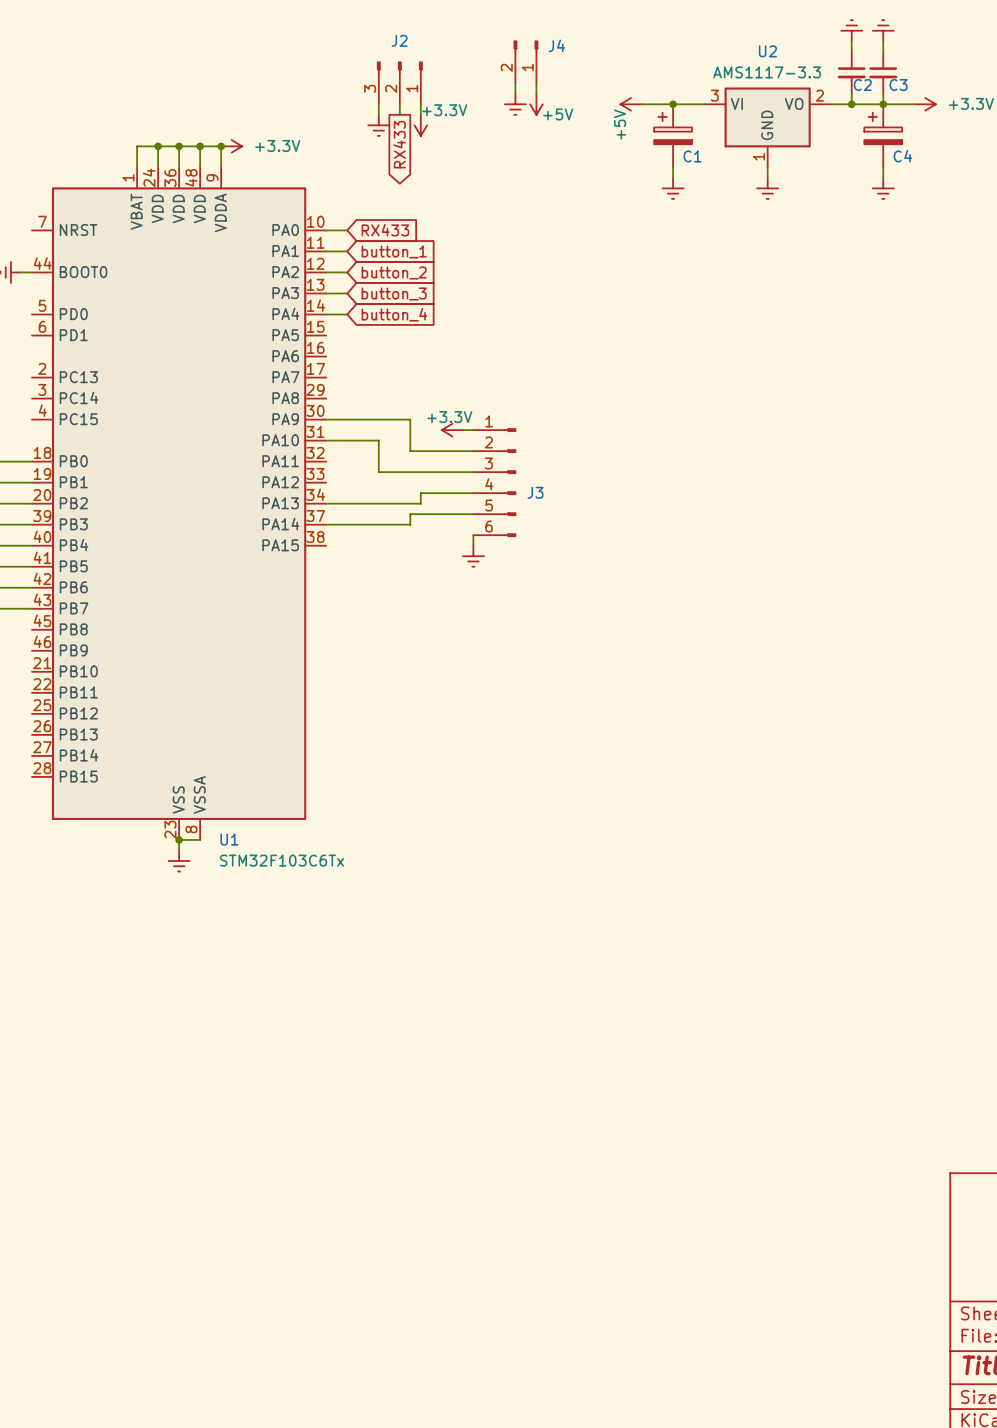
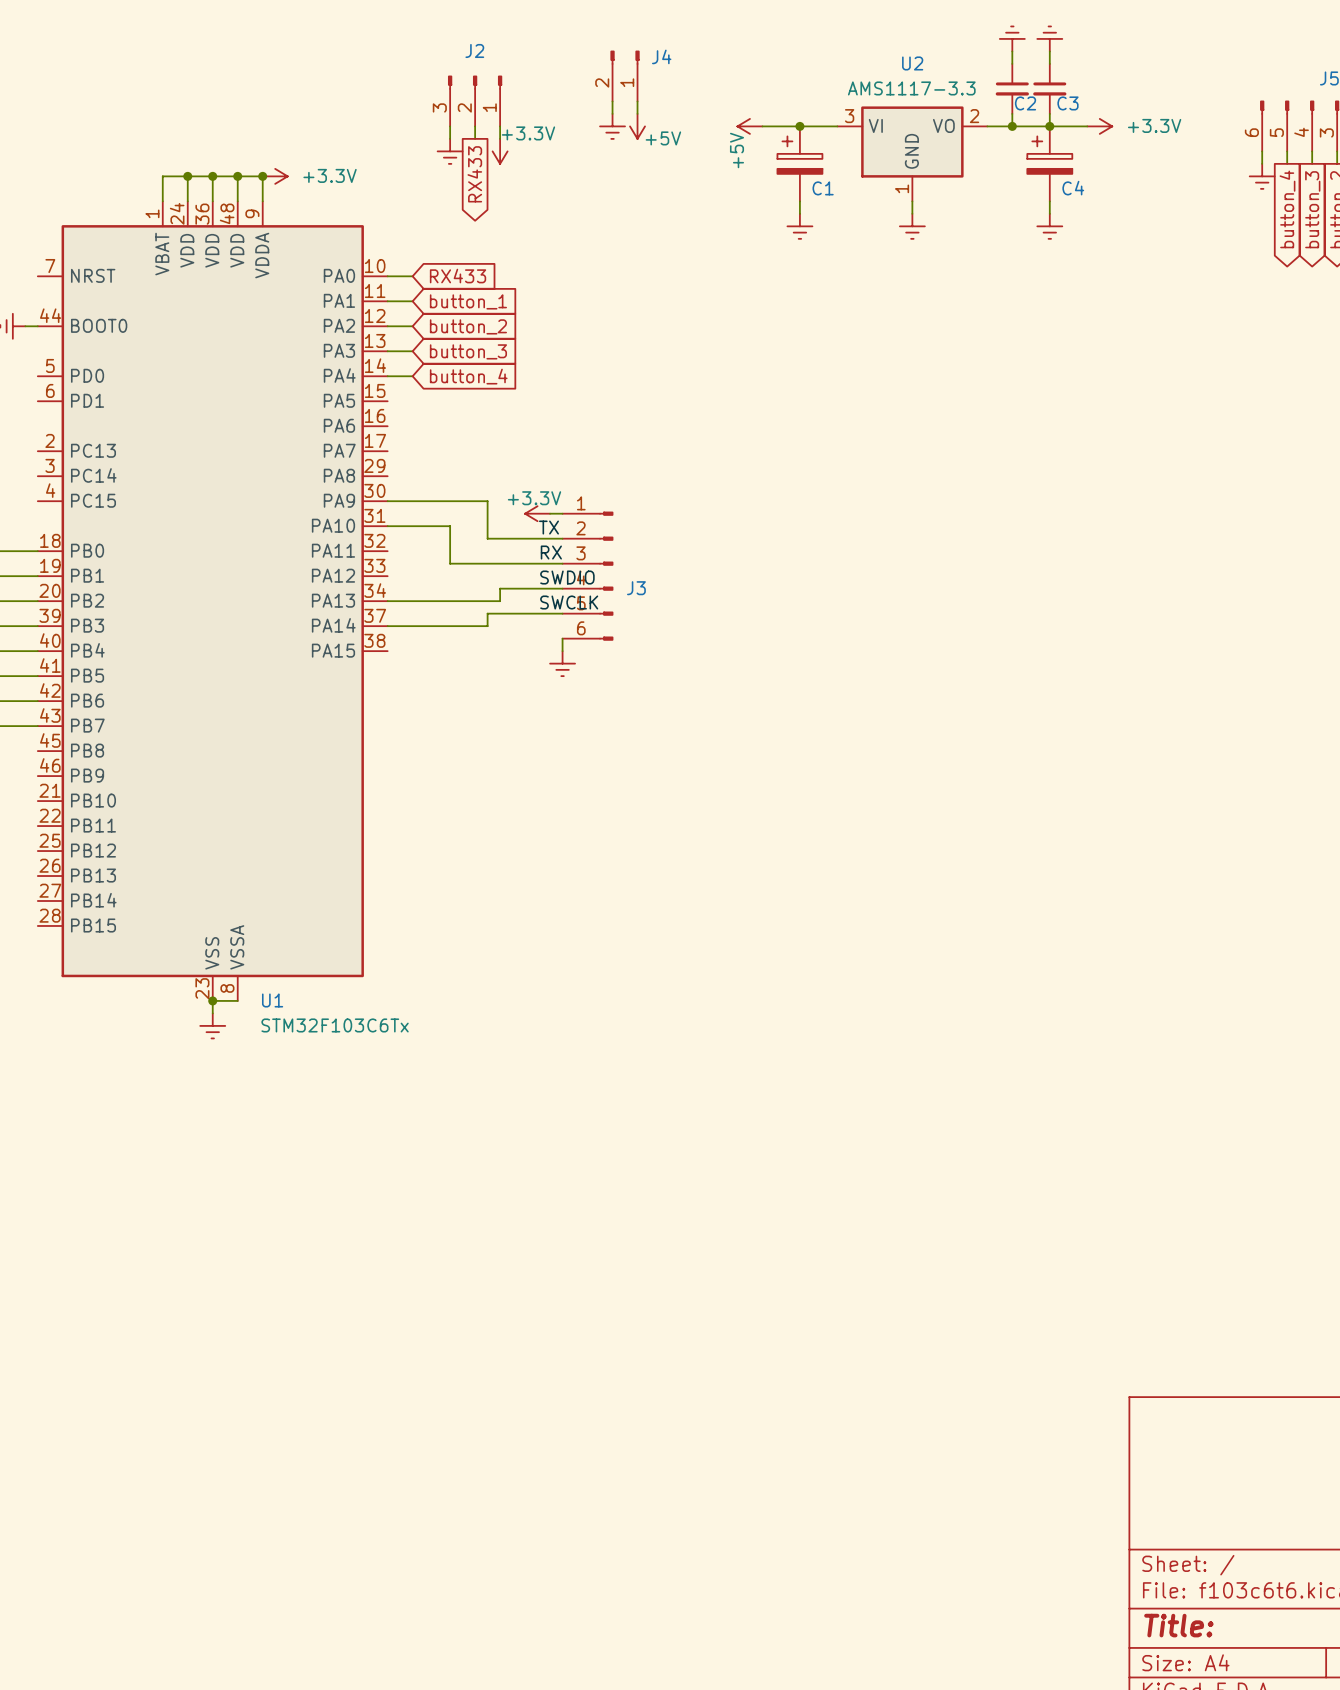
label: none -> TX (548, 527)
label: none -> RX (551, 552)
label: none -> SWDIO (567, 577)
label: none -> SWCLK (569, 602)

